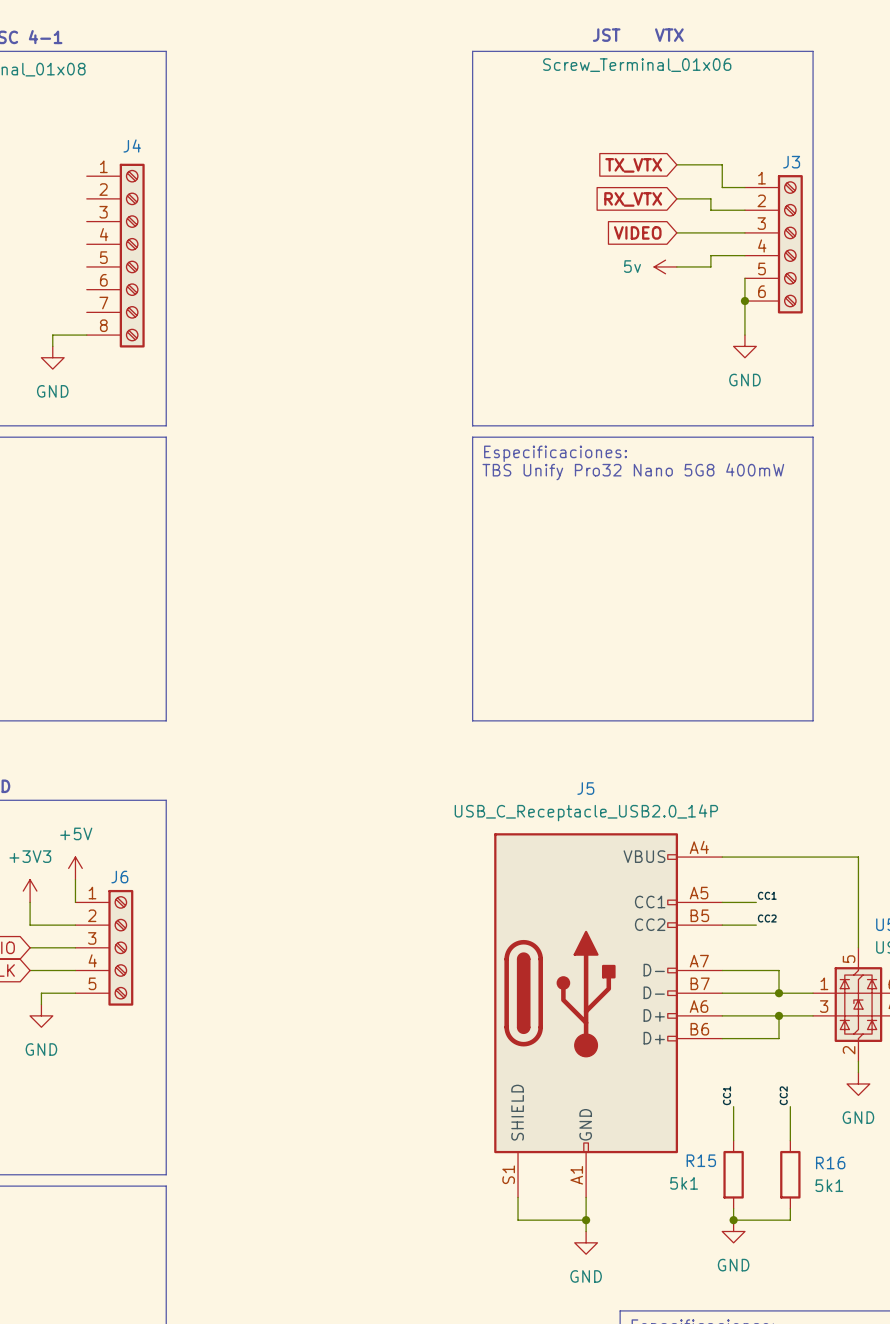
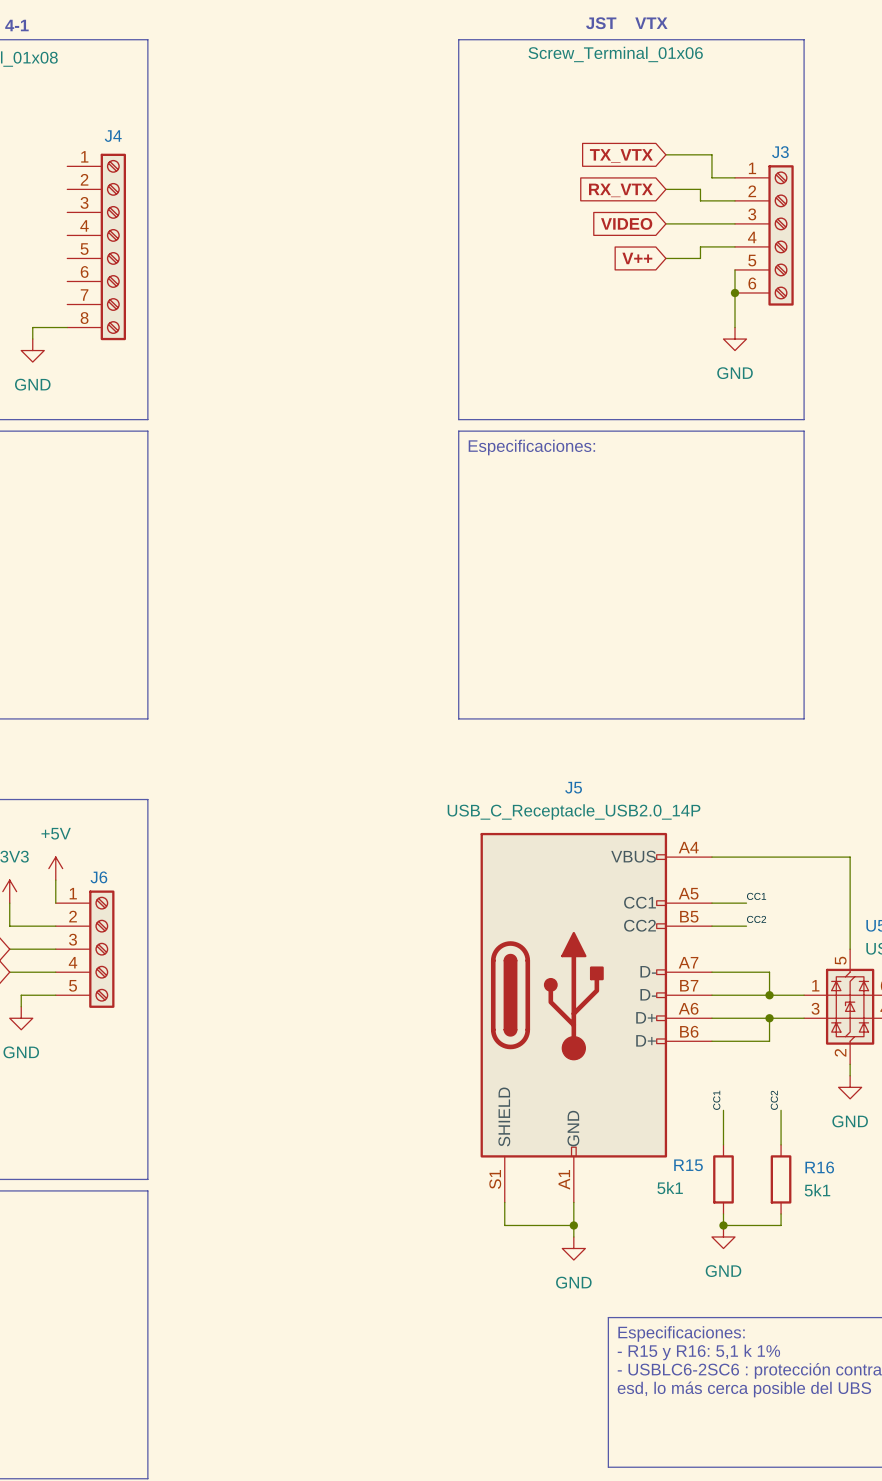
global label: none -> V++ (637, 258)
power symbol: 5v (665, 266) -> none
text: TBS Unify Pro32 Nano 5G8 400mW (633, 471) -> none

